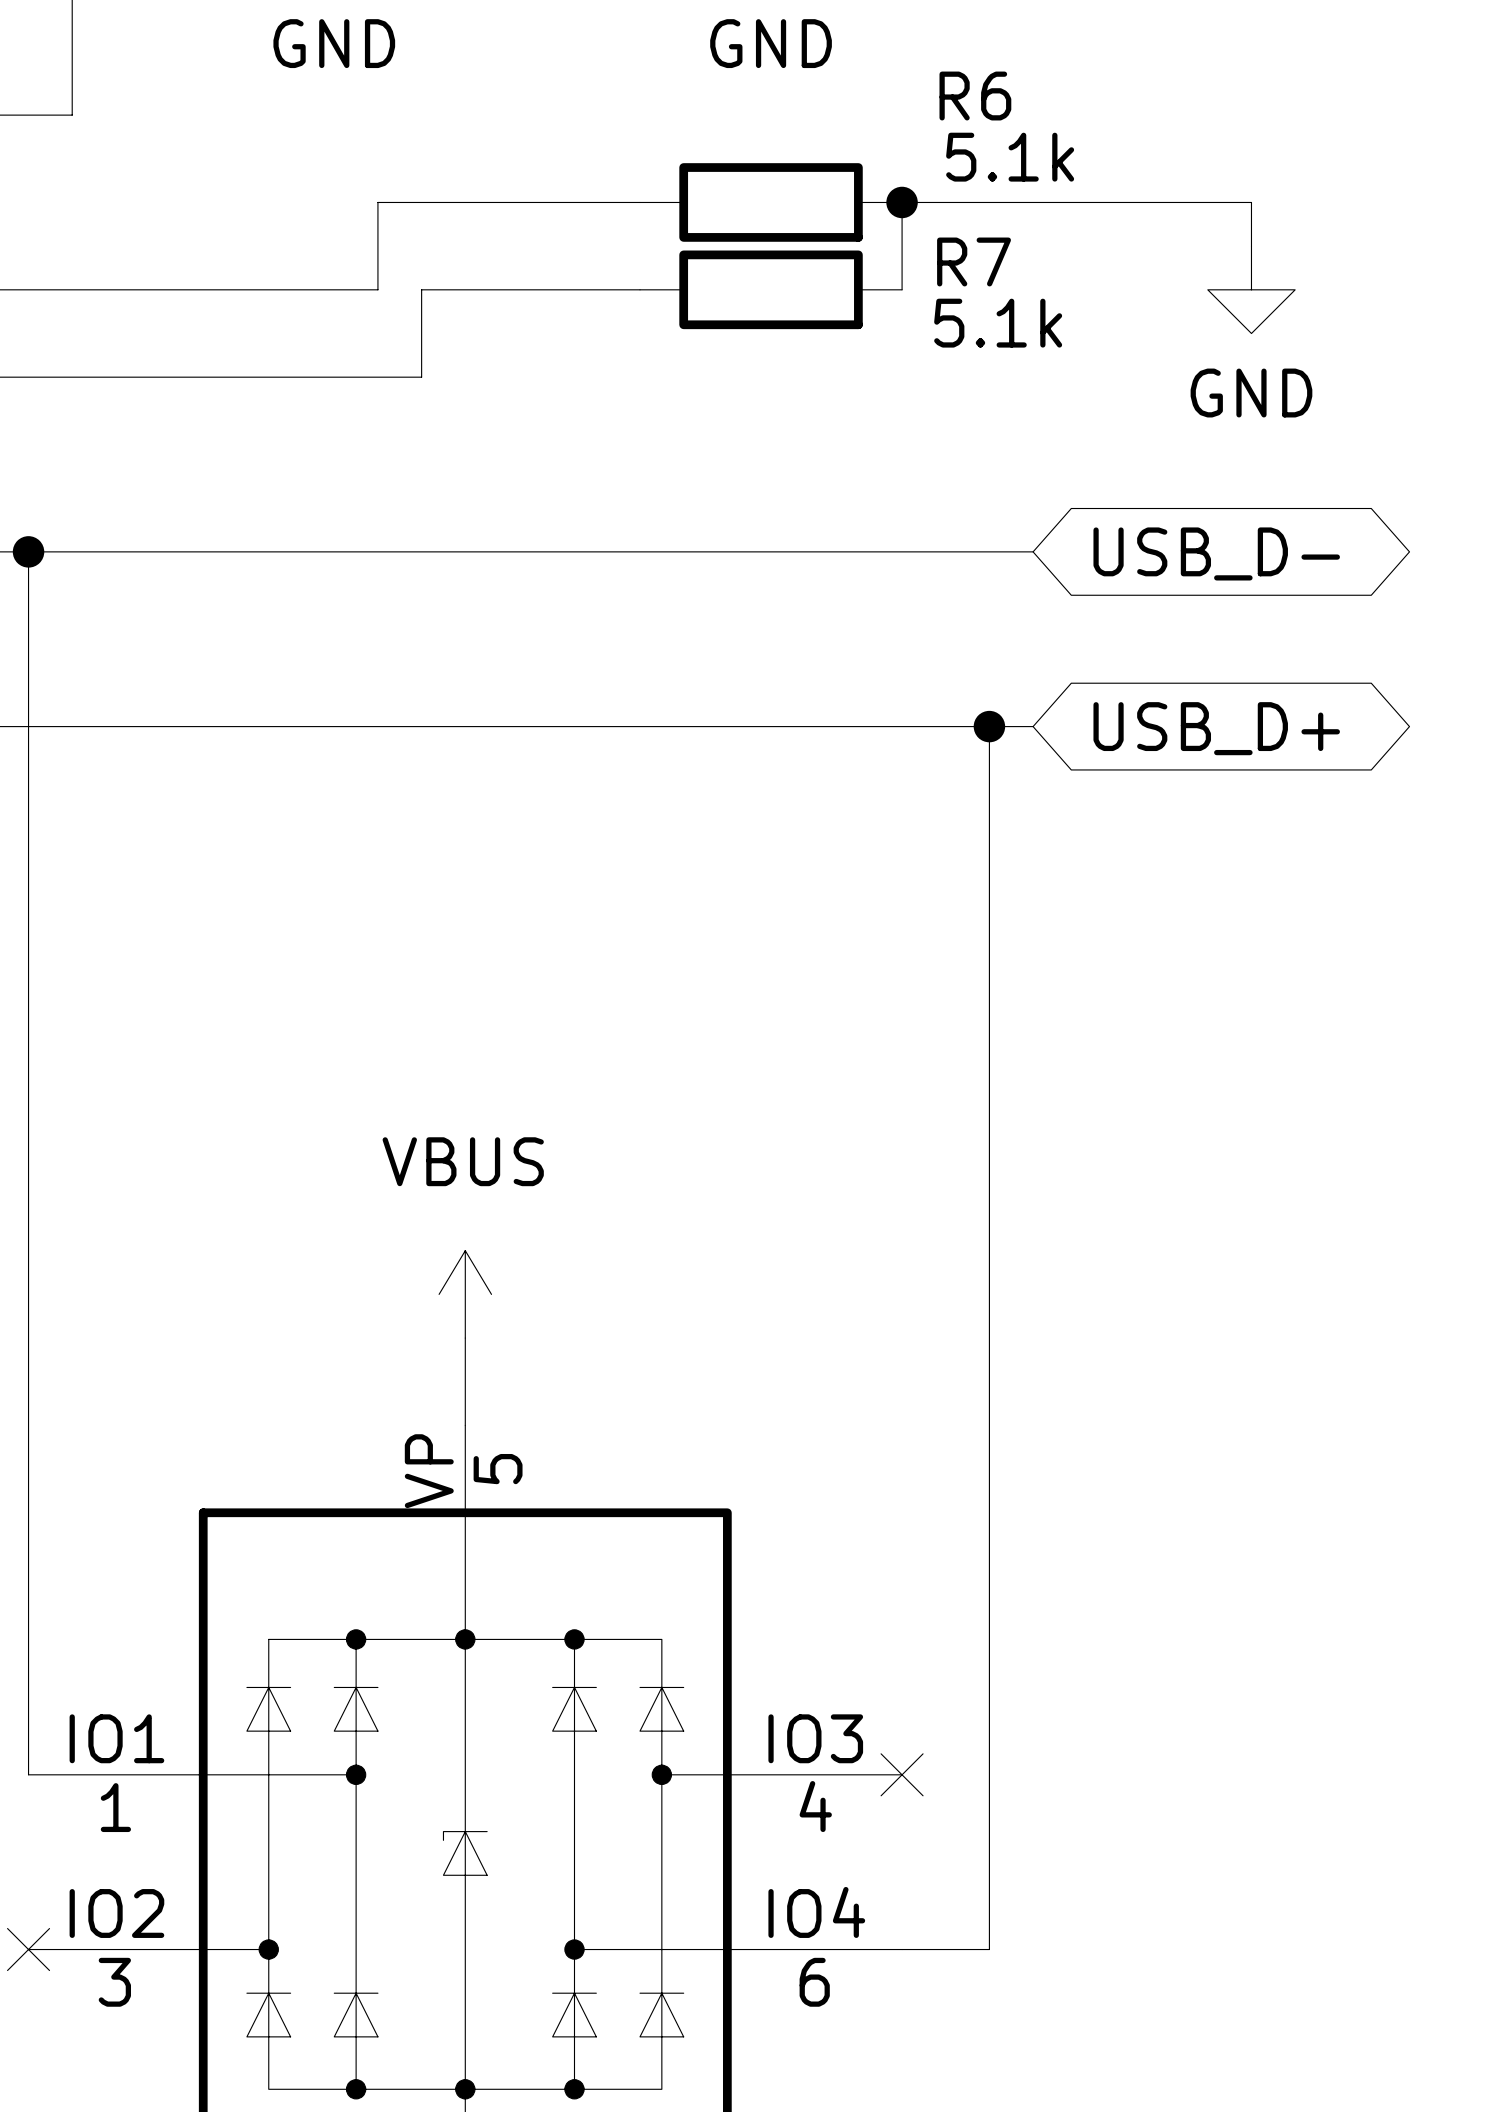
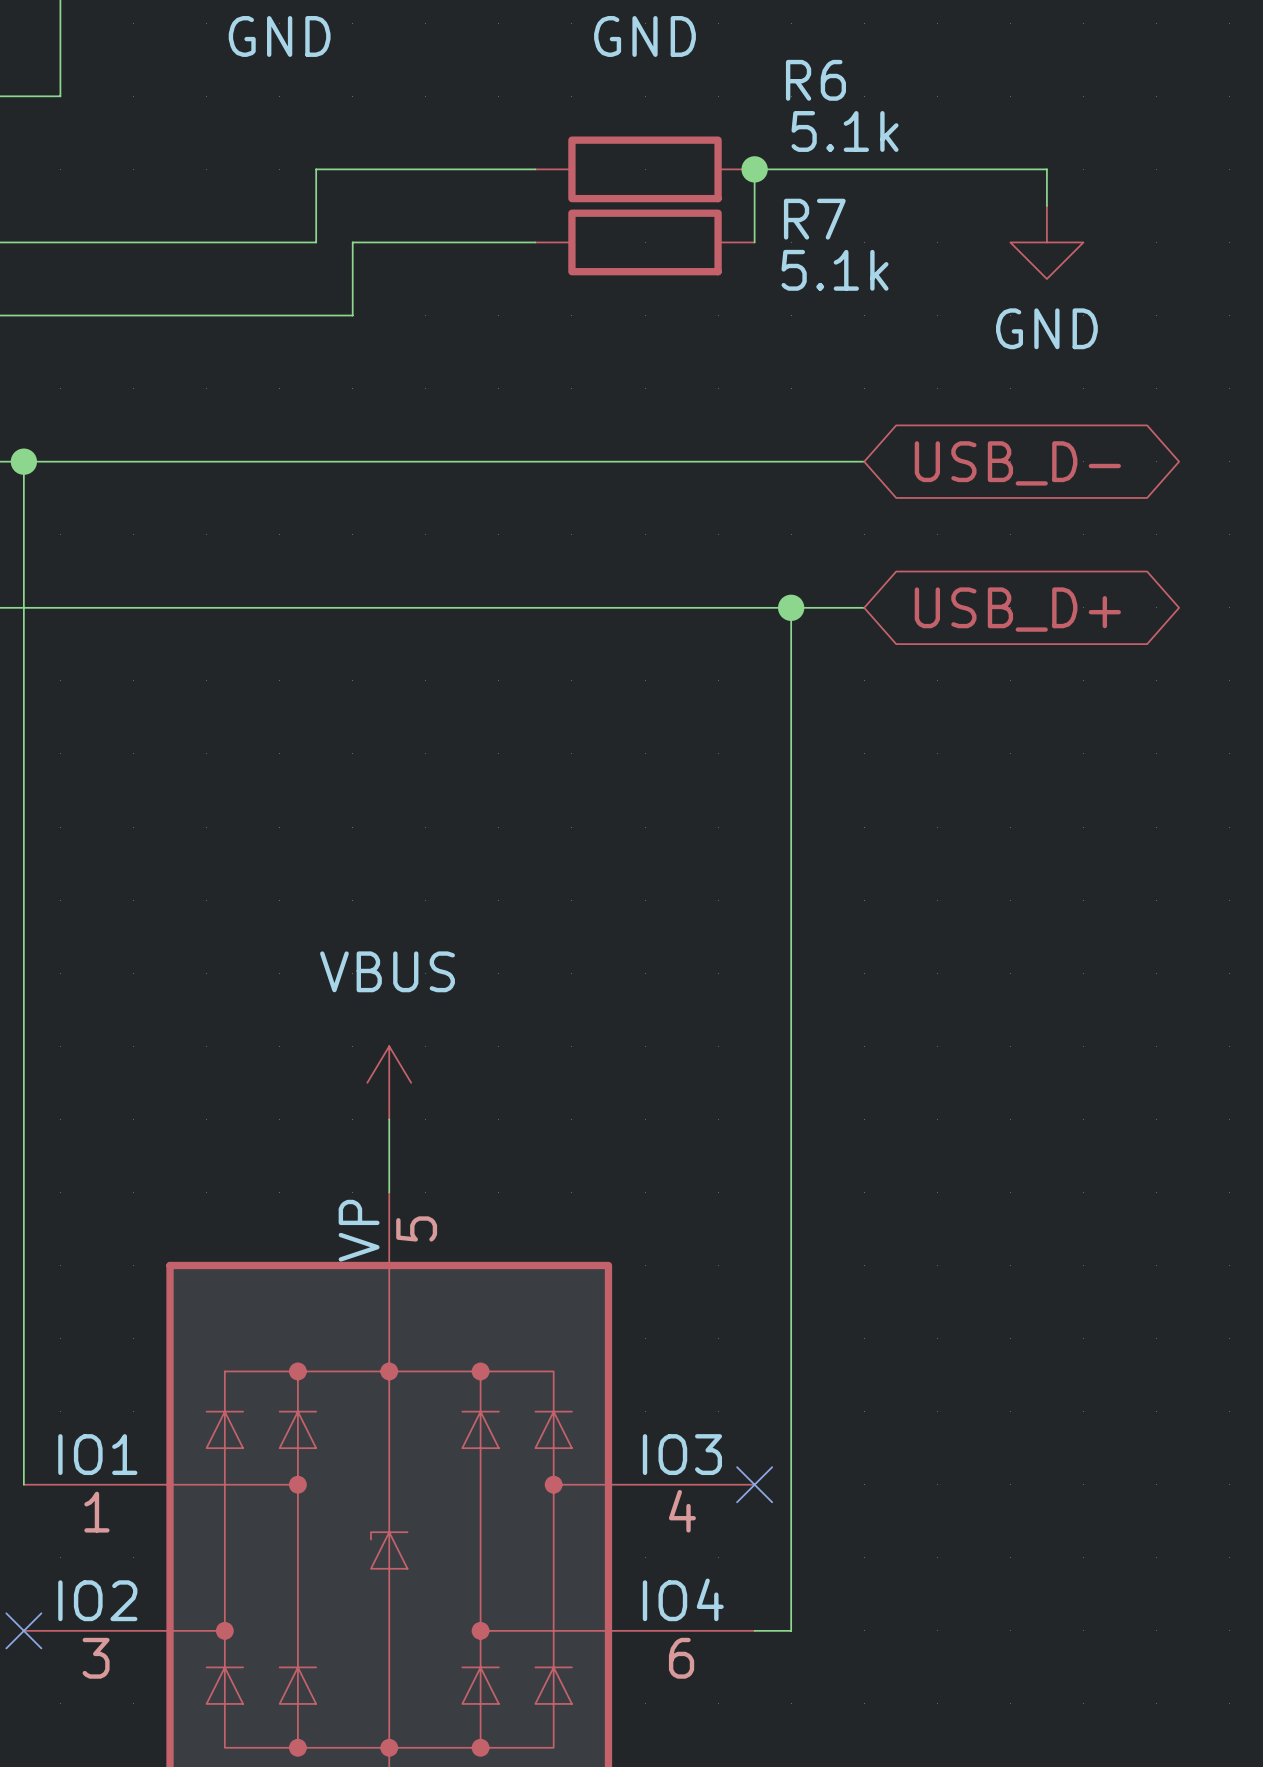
wire: (989, 726) (989, 1949) (945, 1949) -> (791, 607) (791, 1630)
junction position: (989, 726) -> (791, 607)

